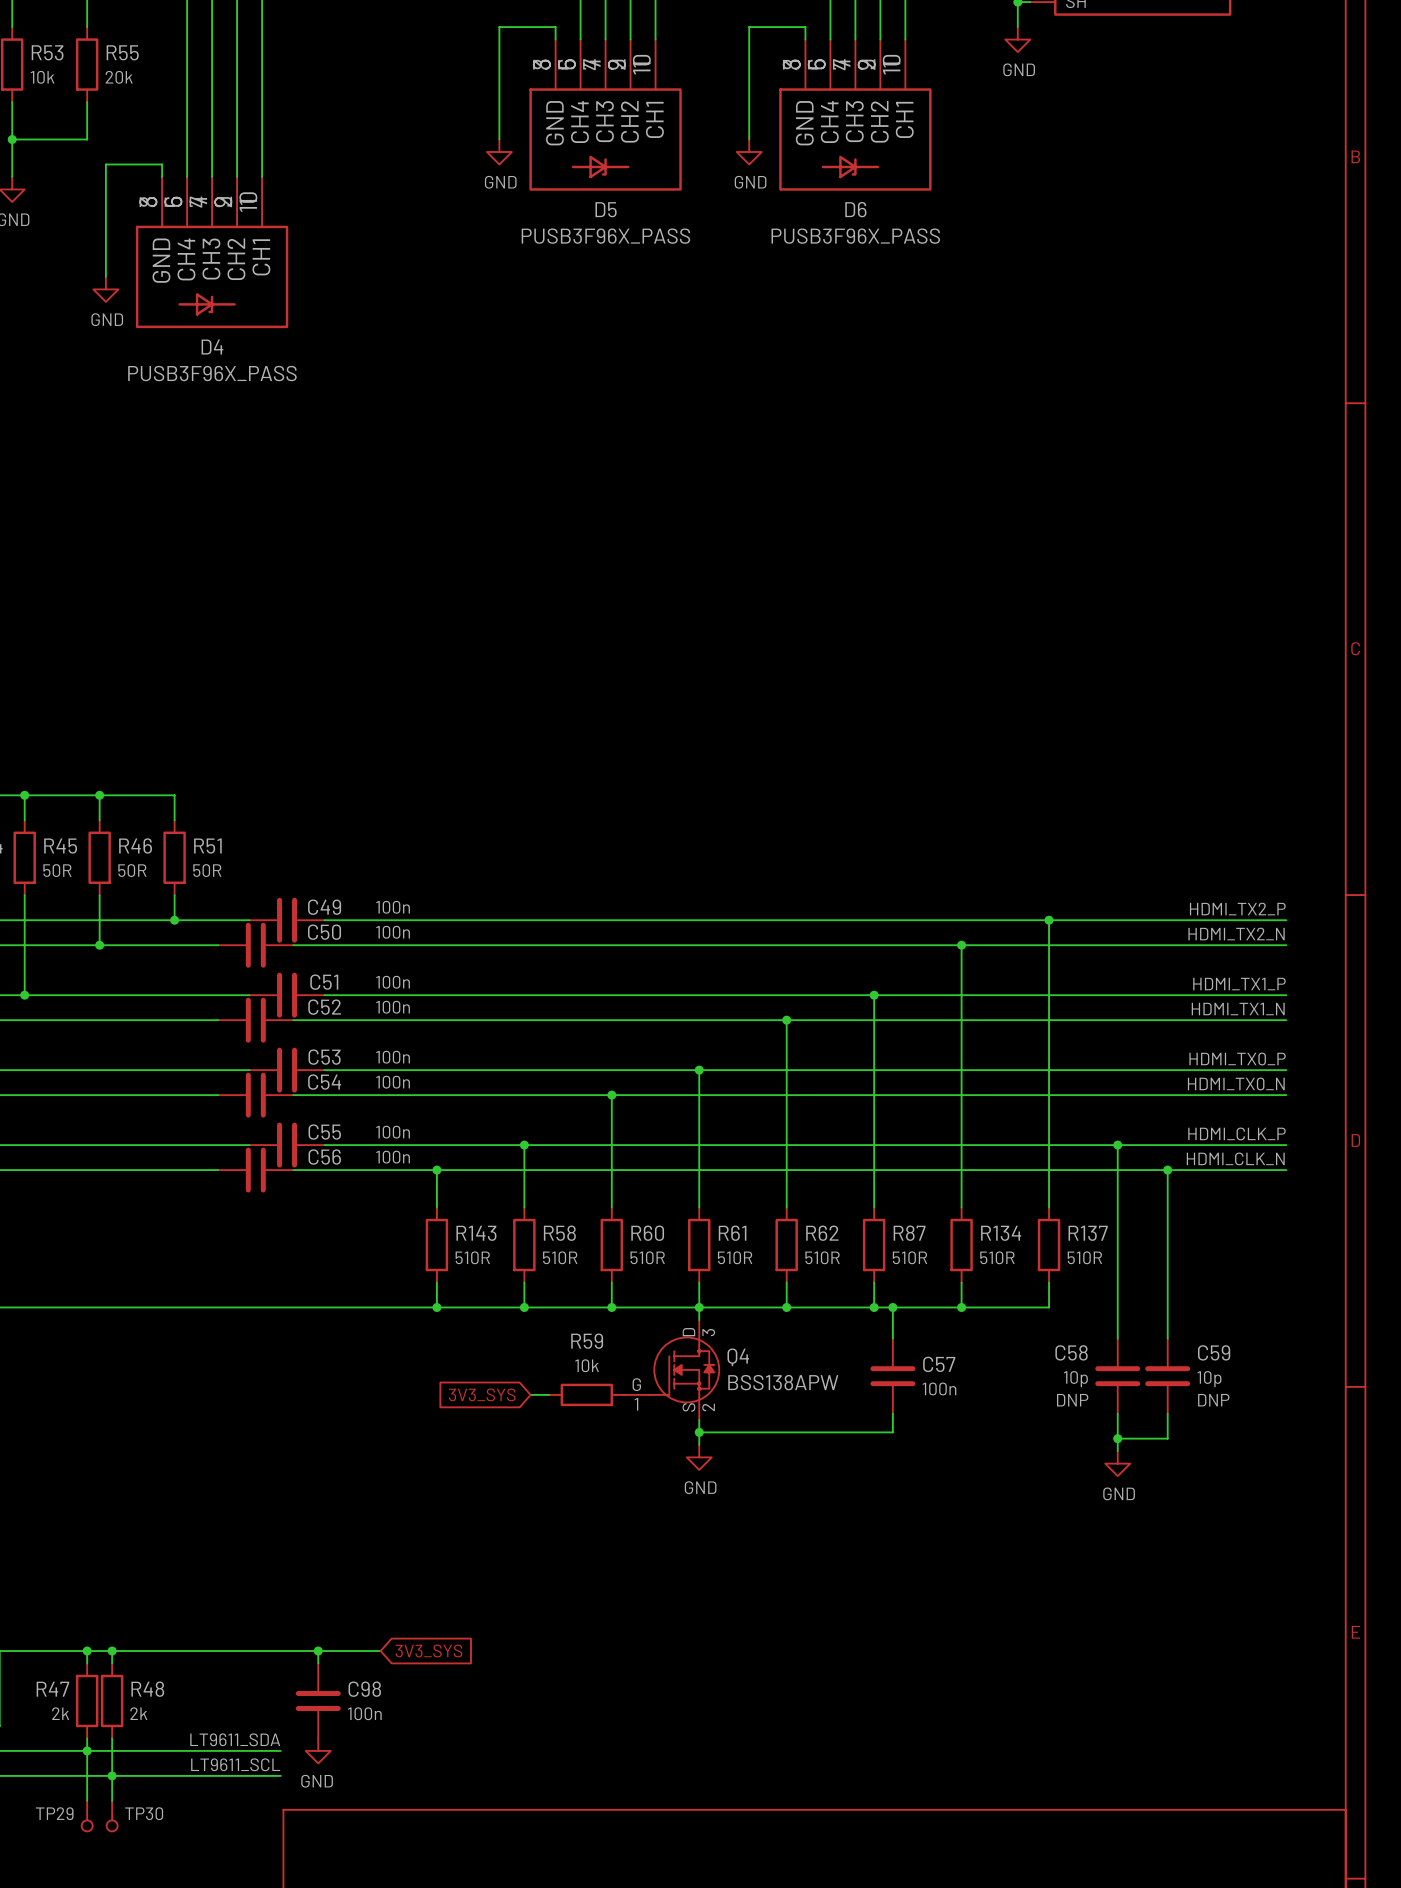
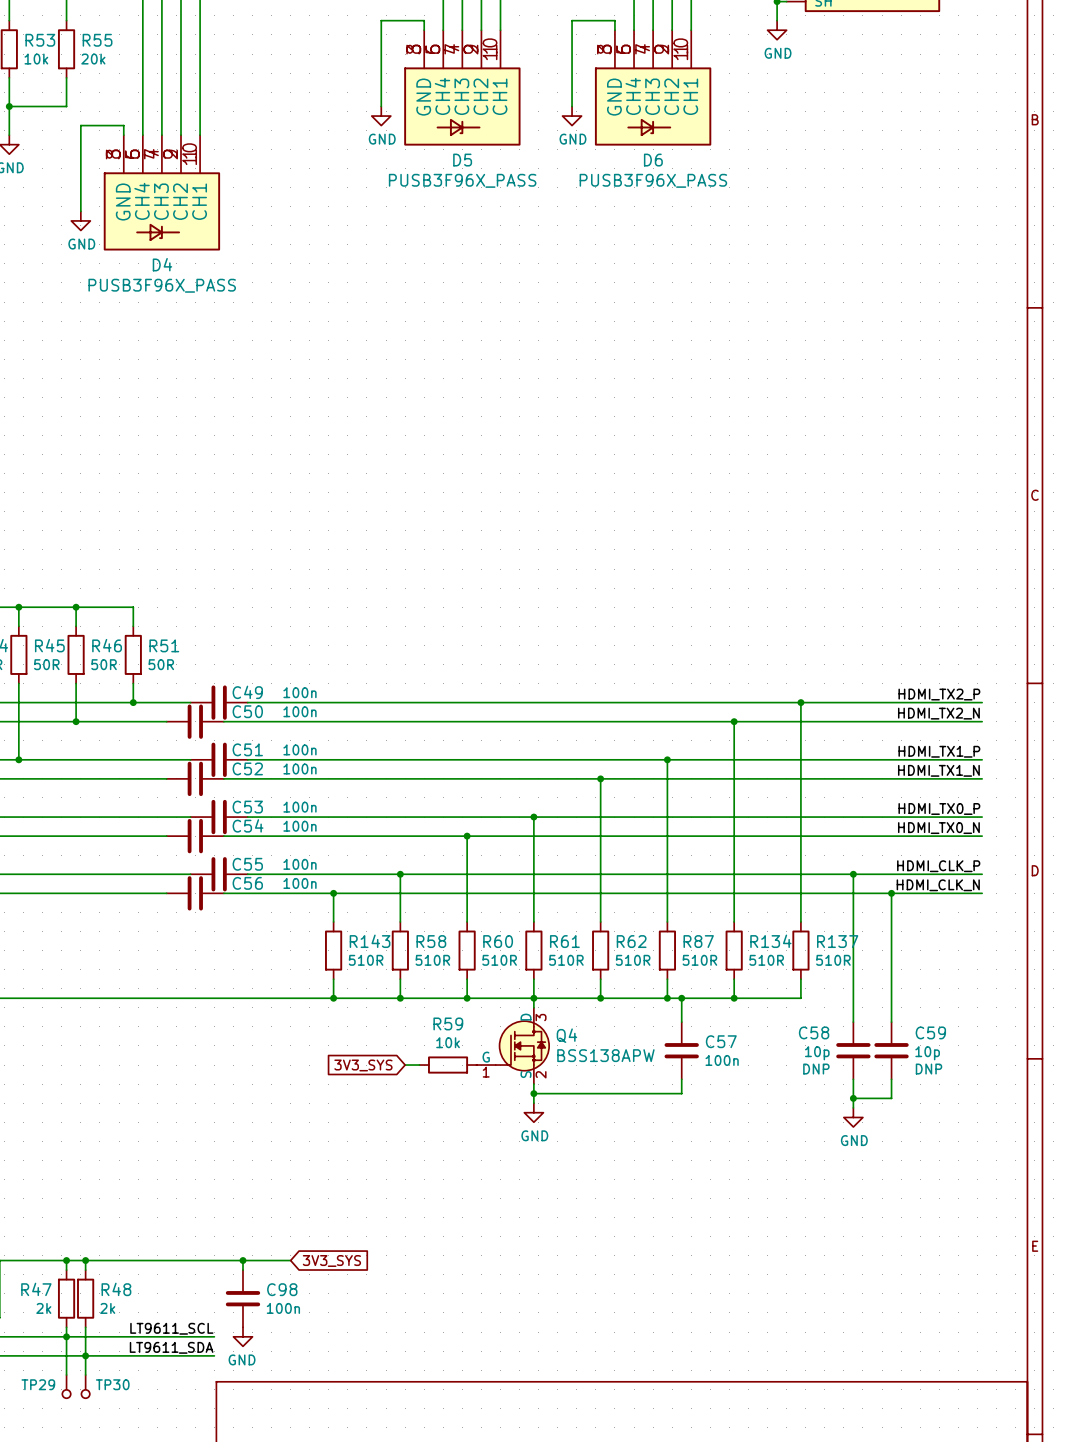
label: LT9611_SDA (235, 1739) -> LT9611_SCL (171, 1328)
label: LT9611_SCL (235, 1764) -> LT9611_SDA (171, 1347)

